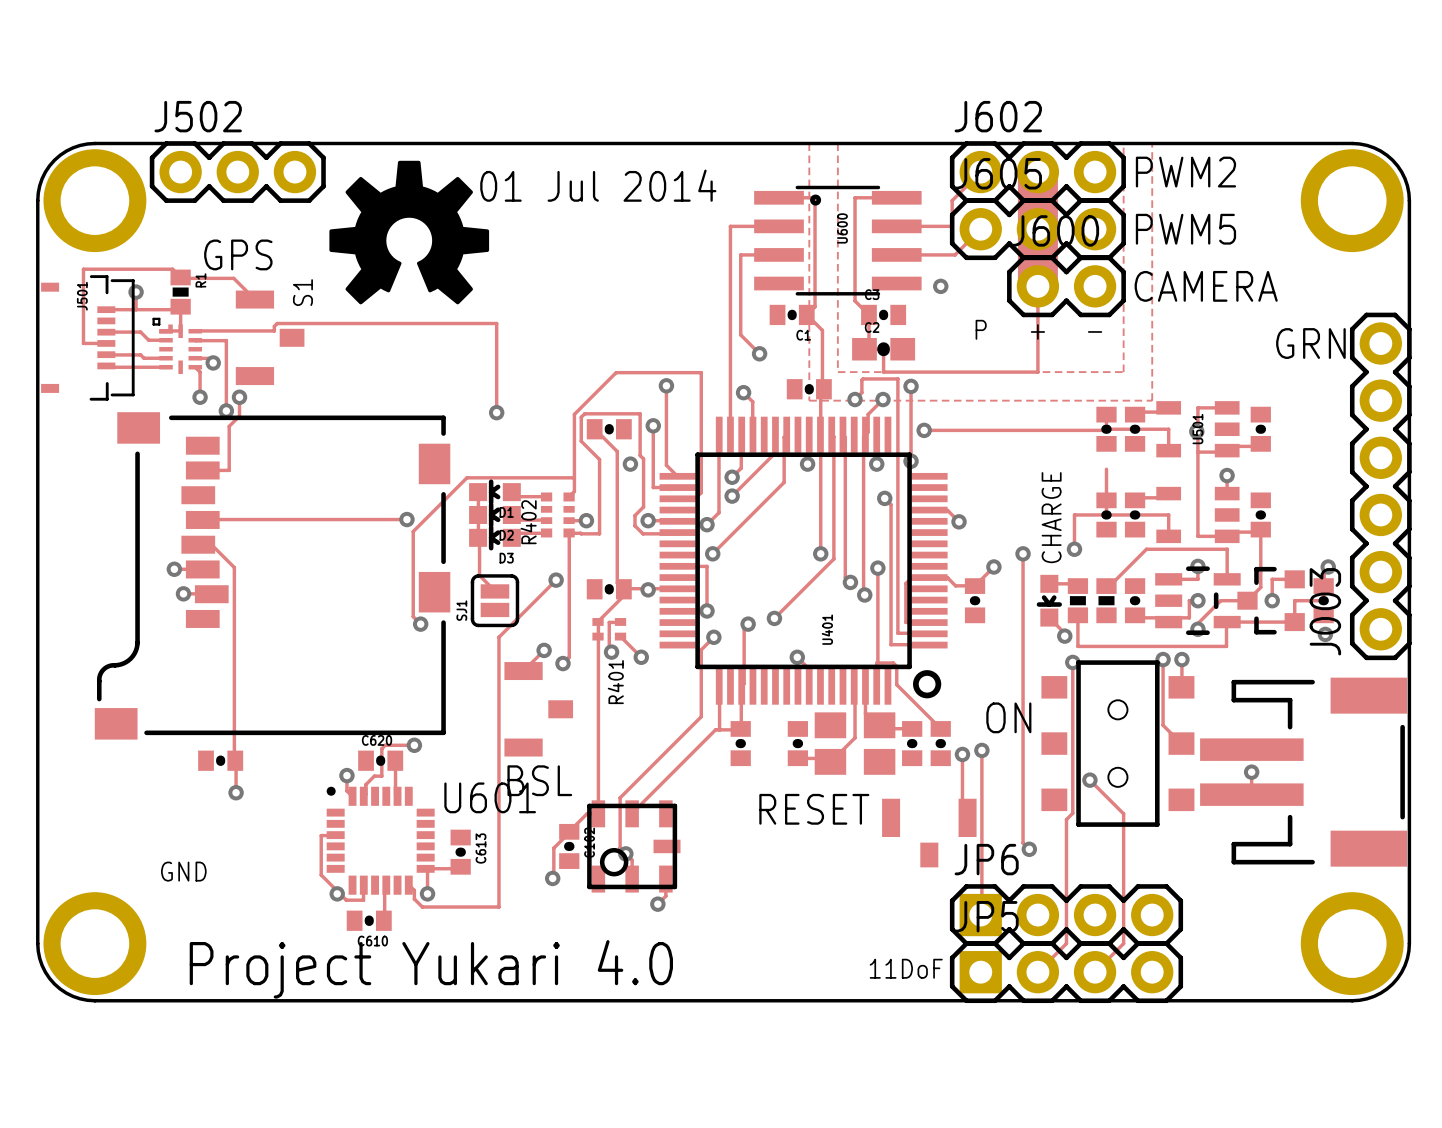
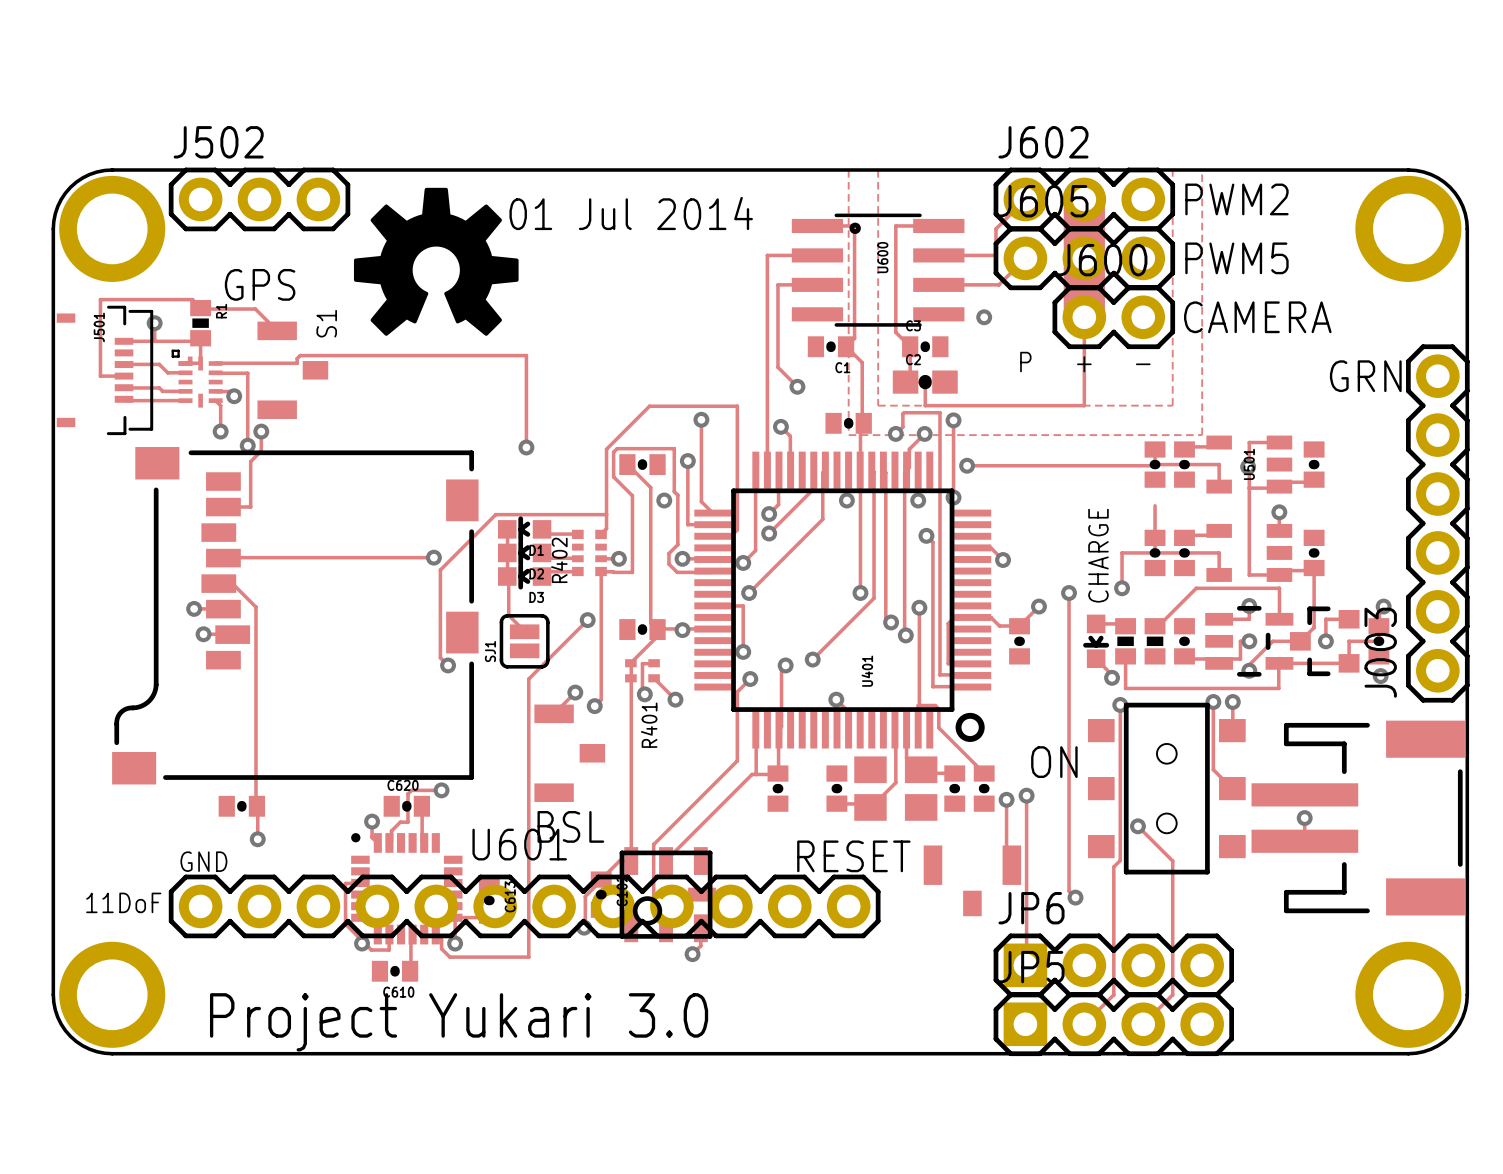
text: none -> 11DoF (123, 902)
part: none -> (524, 906)
text position: GND (183, 871) -> GND (203, 861)
text: 11DoF (906, 968) -> none
text: Project Yukari 4.0 (431, 969) -> Project Yukari 3.0 (459, 1022)

